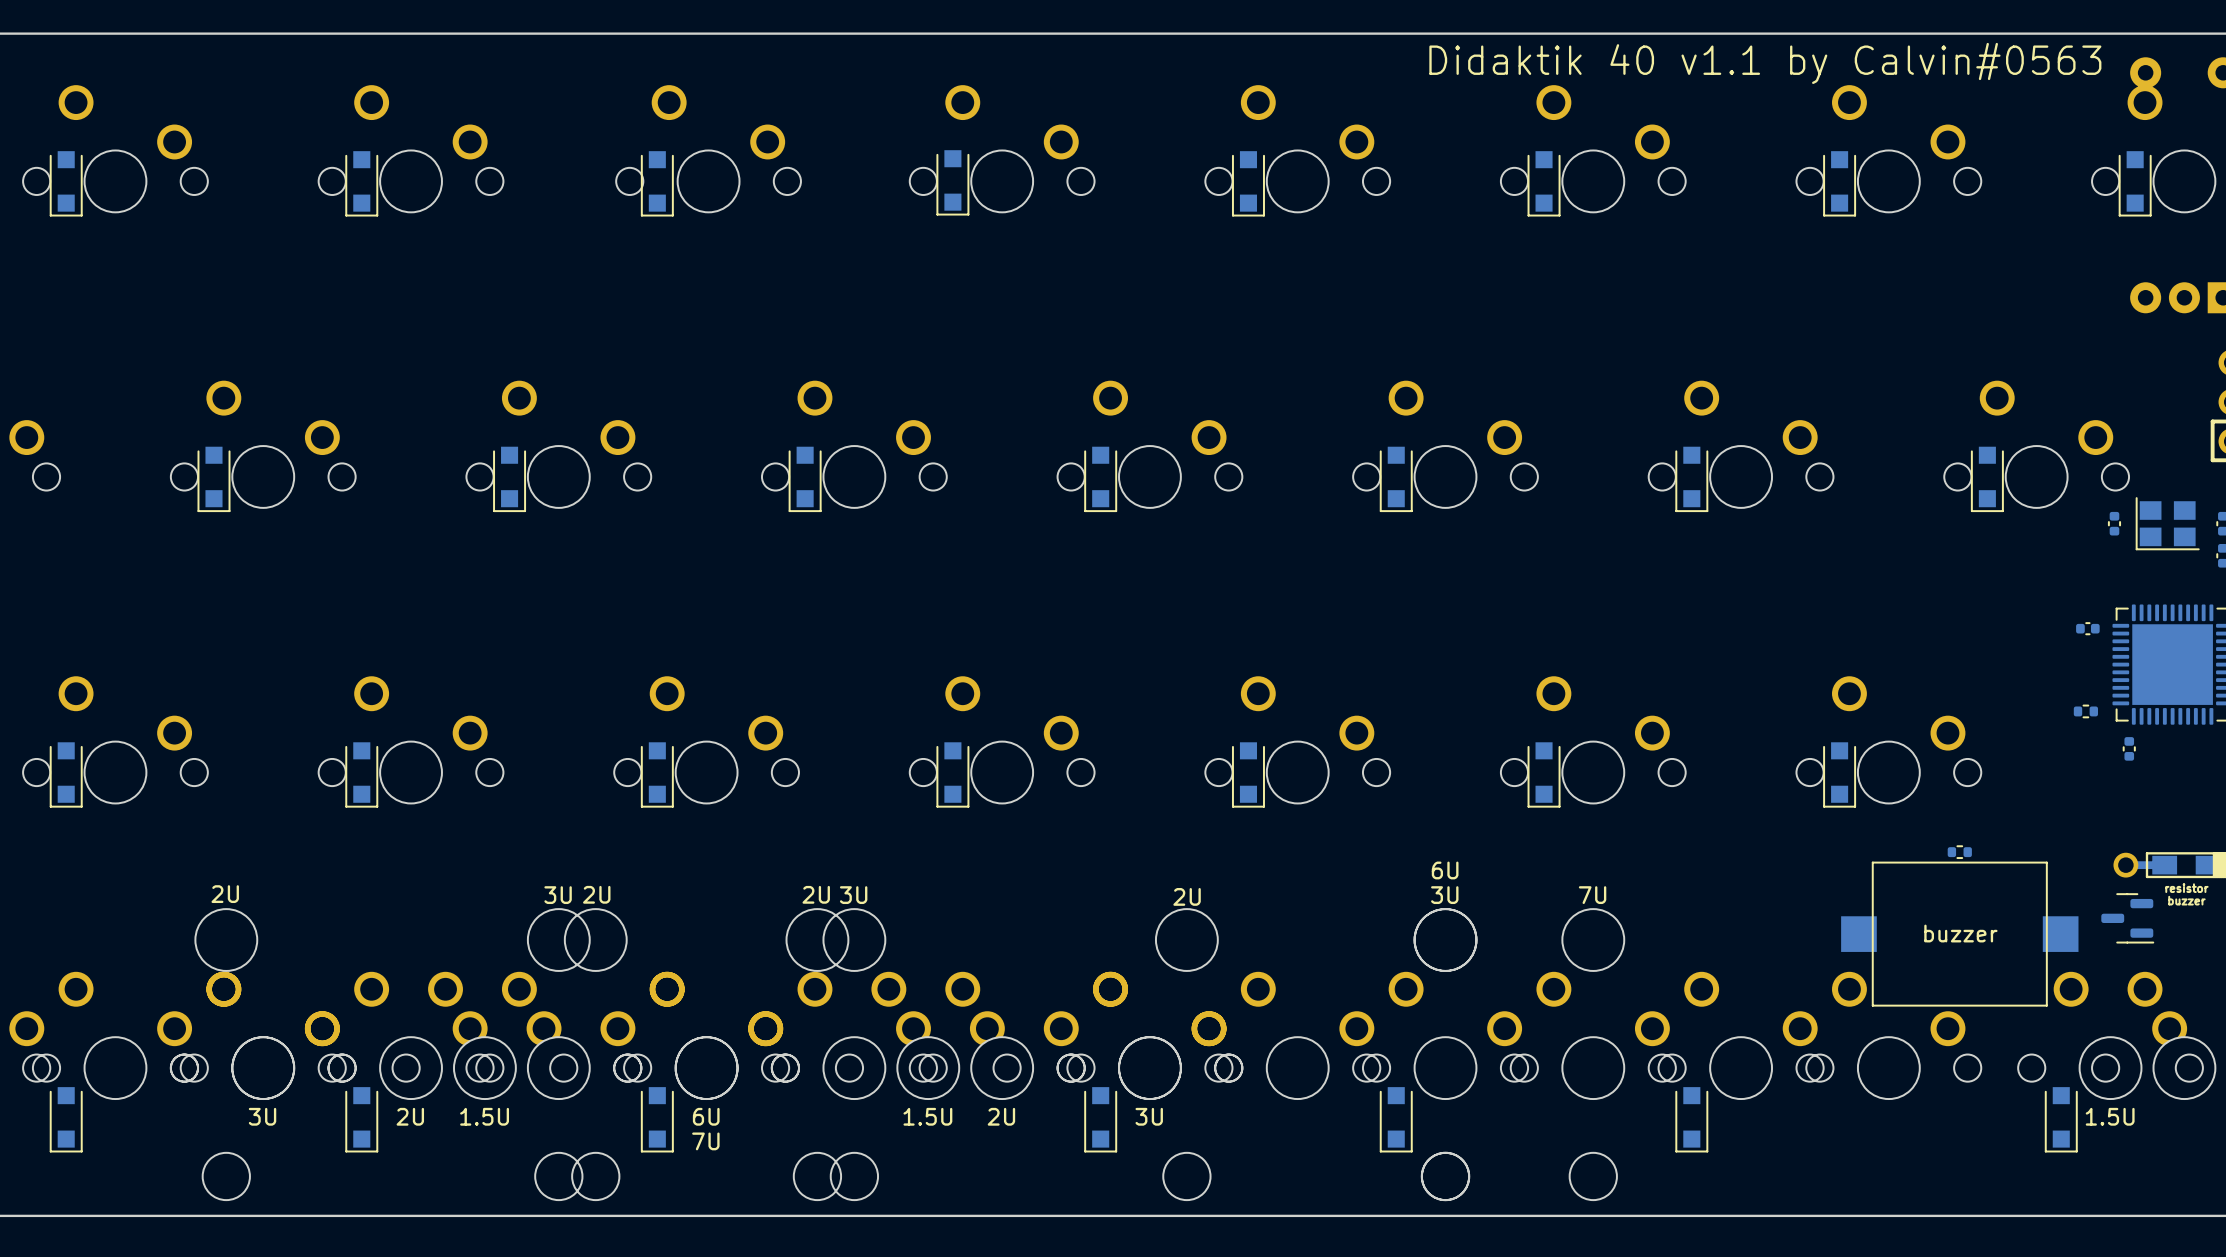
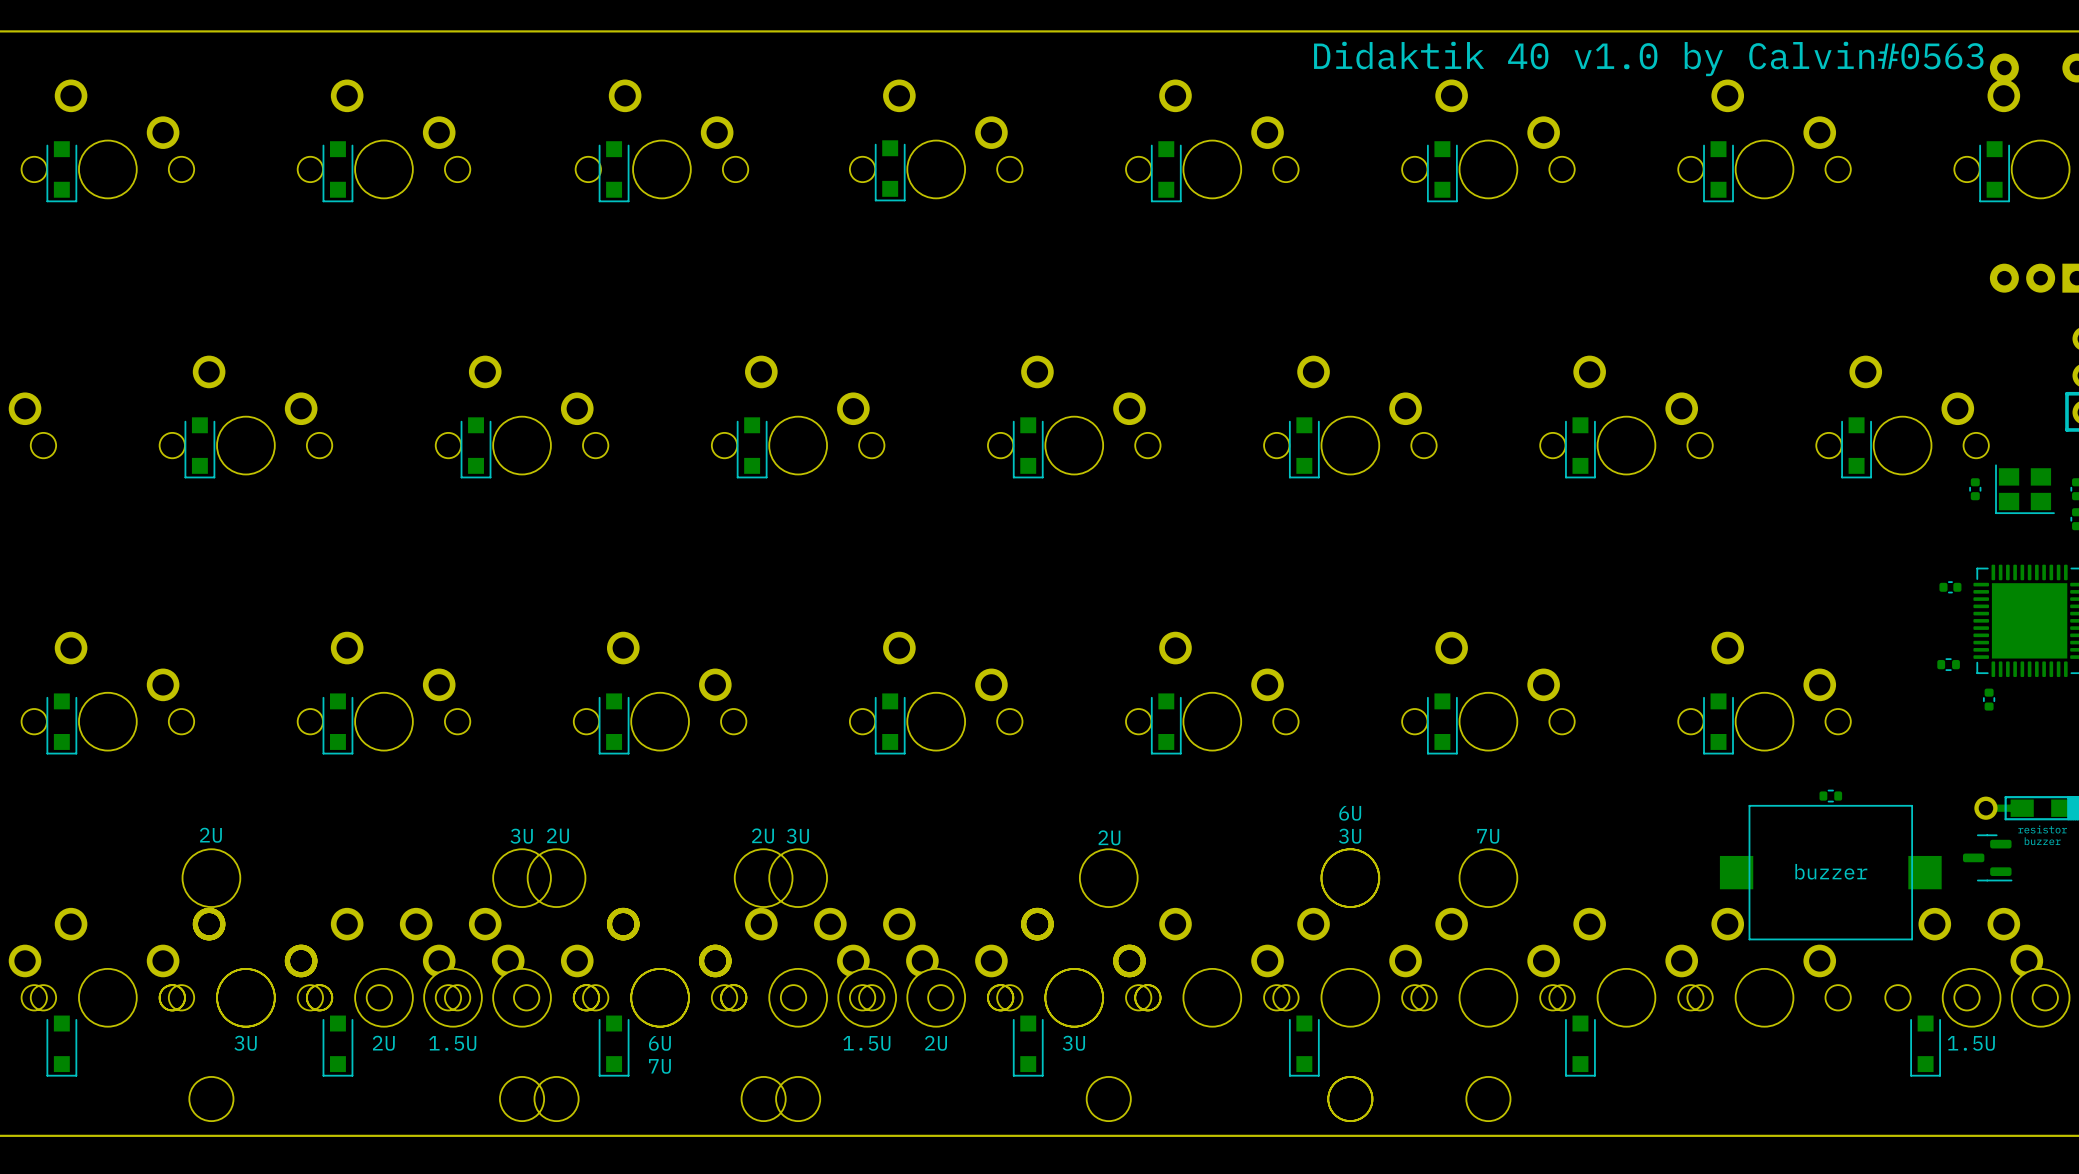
text: Didaktik 40 v1.1 by Calvin#0563 (1765, 63) -> Didaktik 40 v1.0 by Calvin#0563 (1648, 58)

